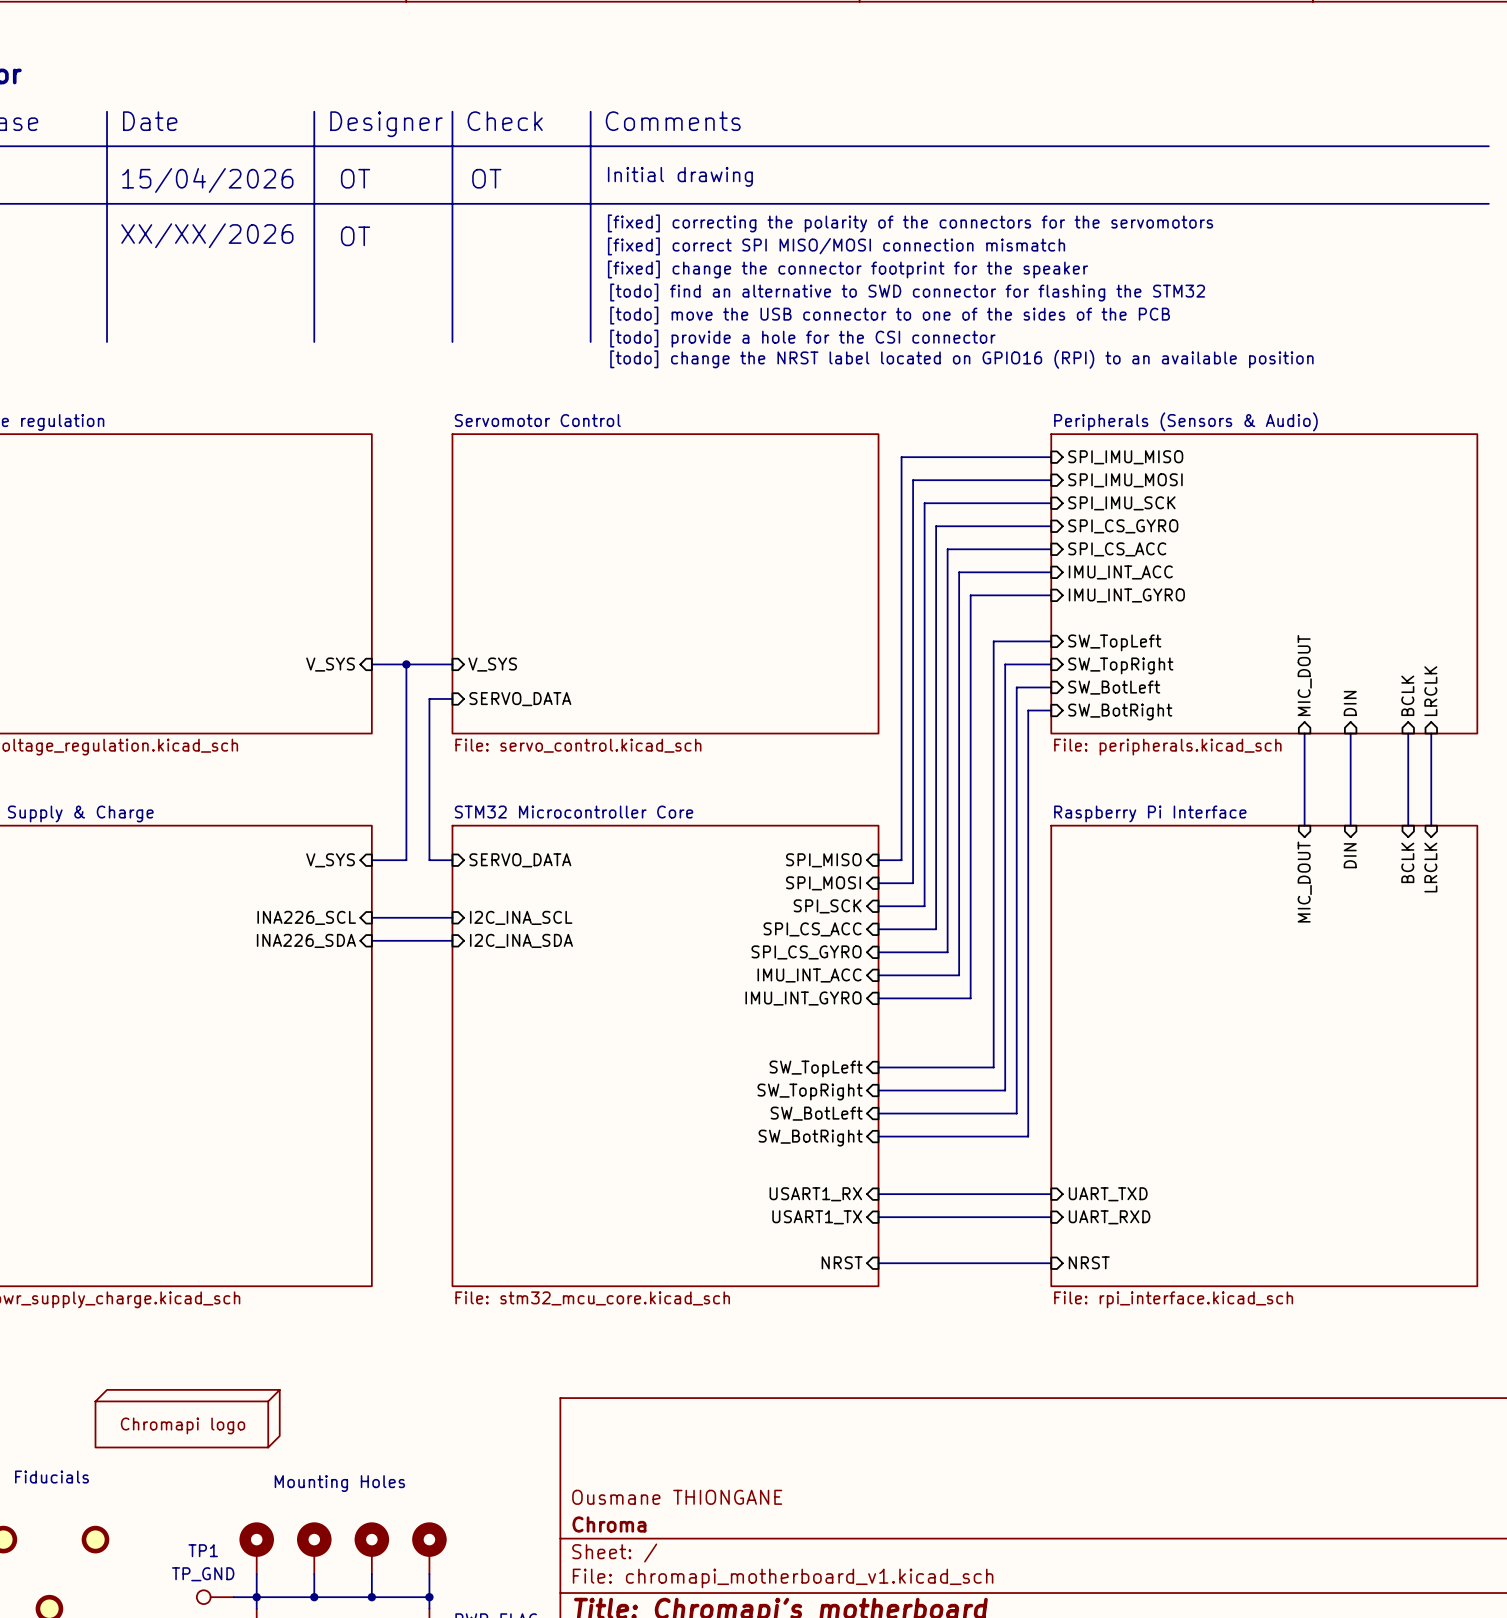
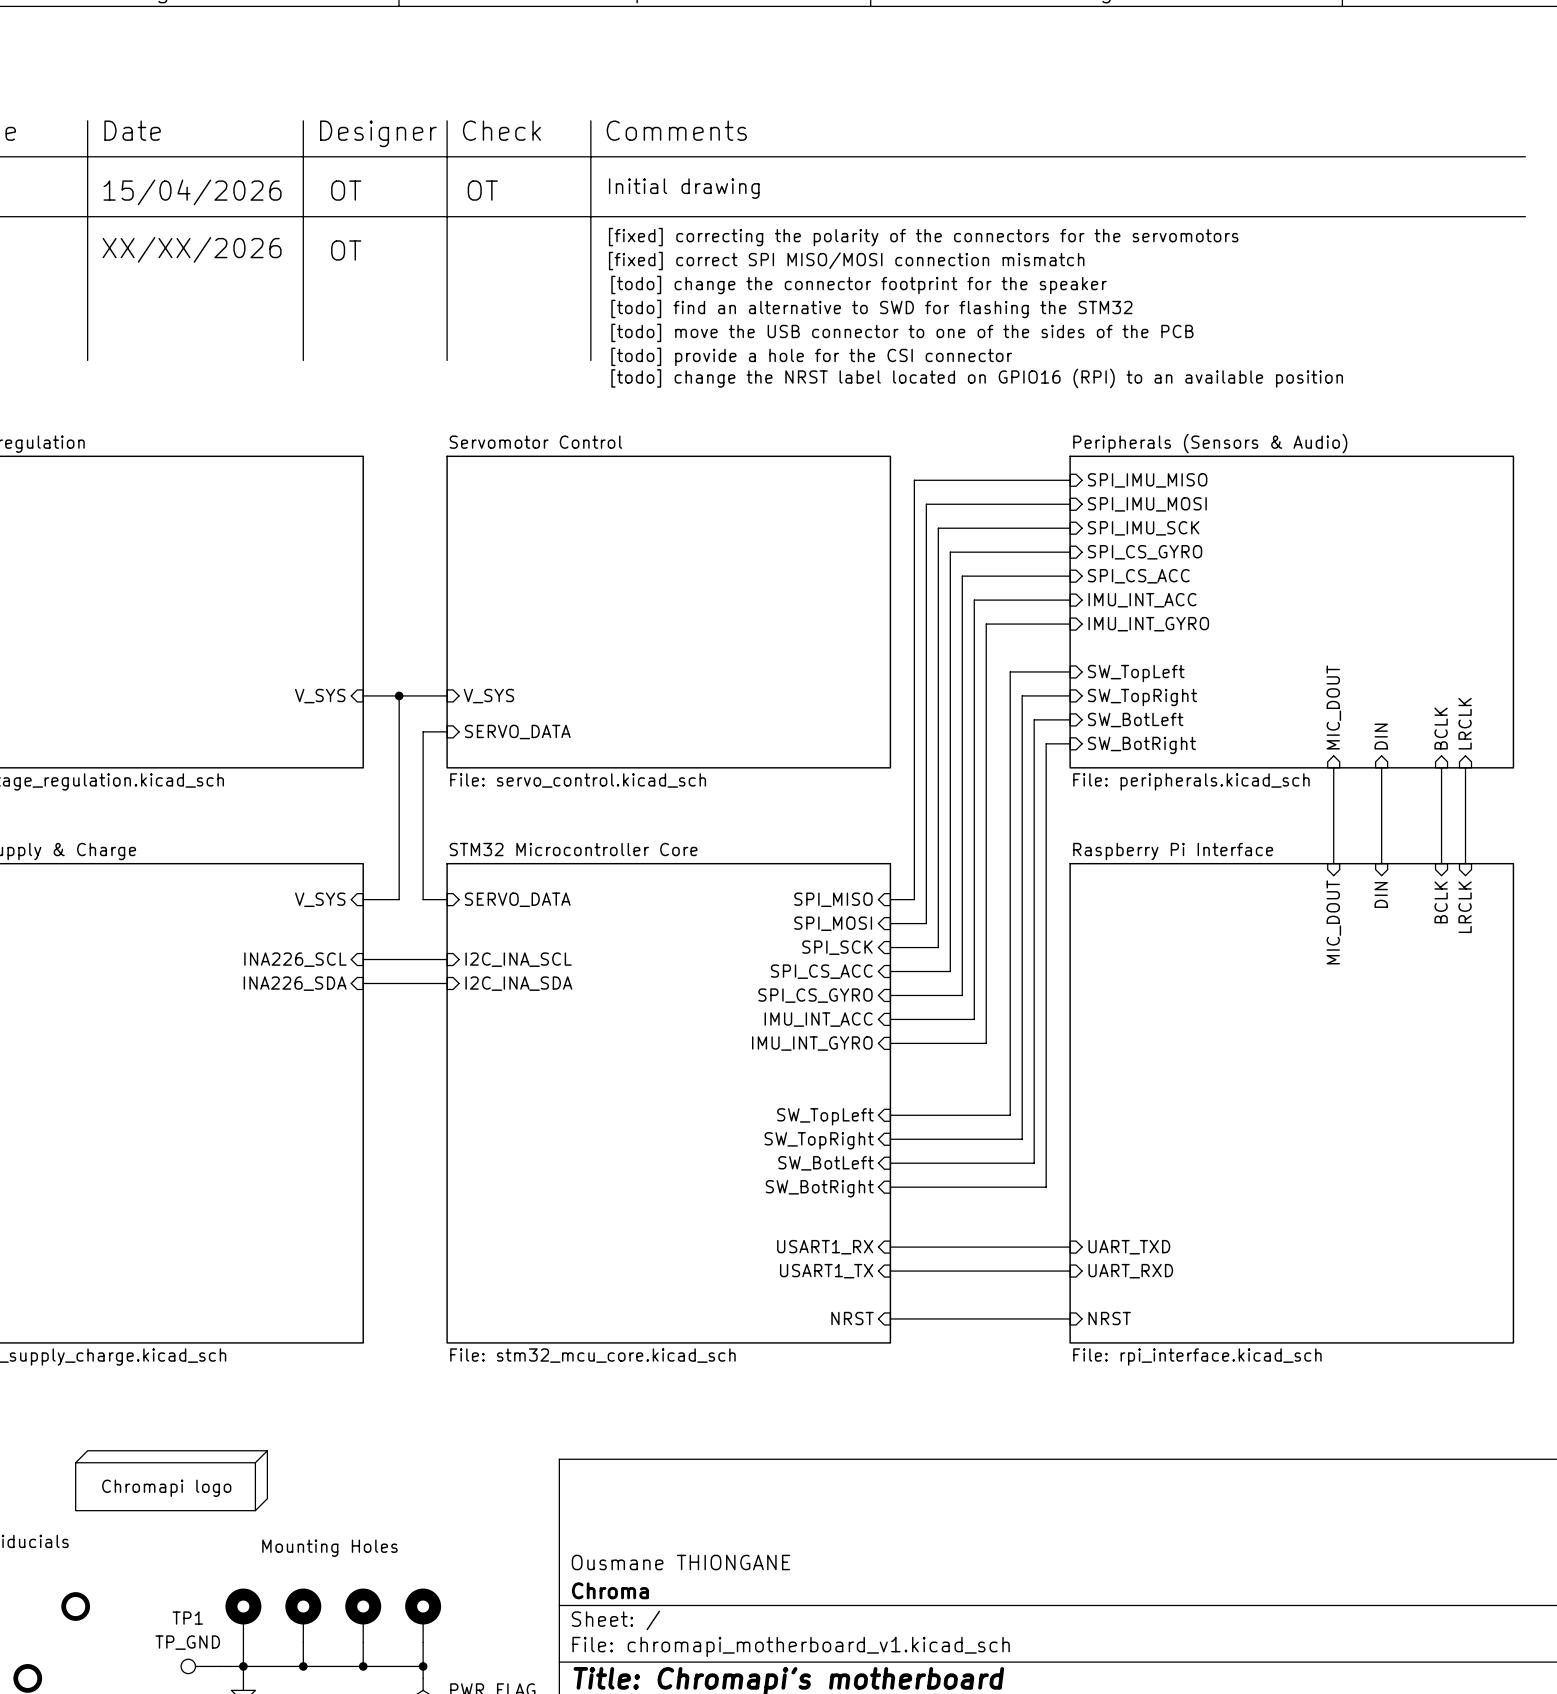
text: [fixed] change the connector footprint for the speaker (848, 269) -> [todo] change the connector footprint for the speaker (859, 284)
text: [todo] find an alternative to SWD connector for flashing the STM32 (907, 292) -> [todo] find an alternative to SWD for flashing the STM32 (871, 308)

